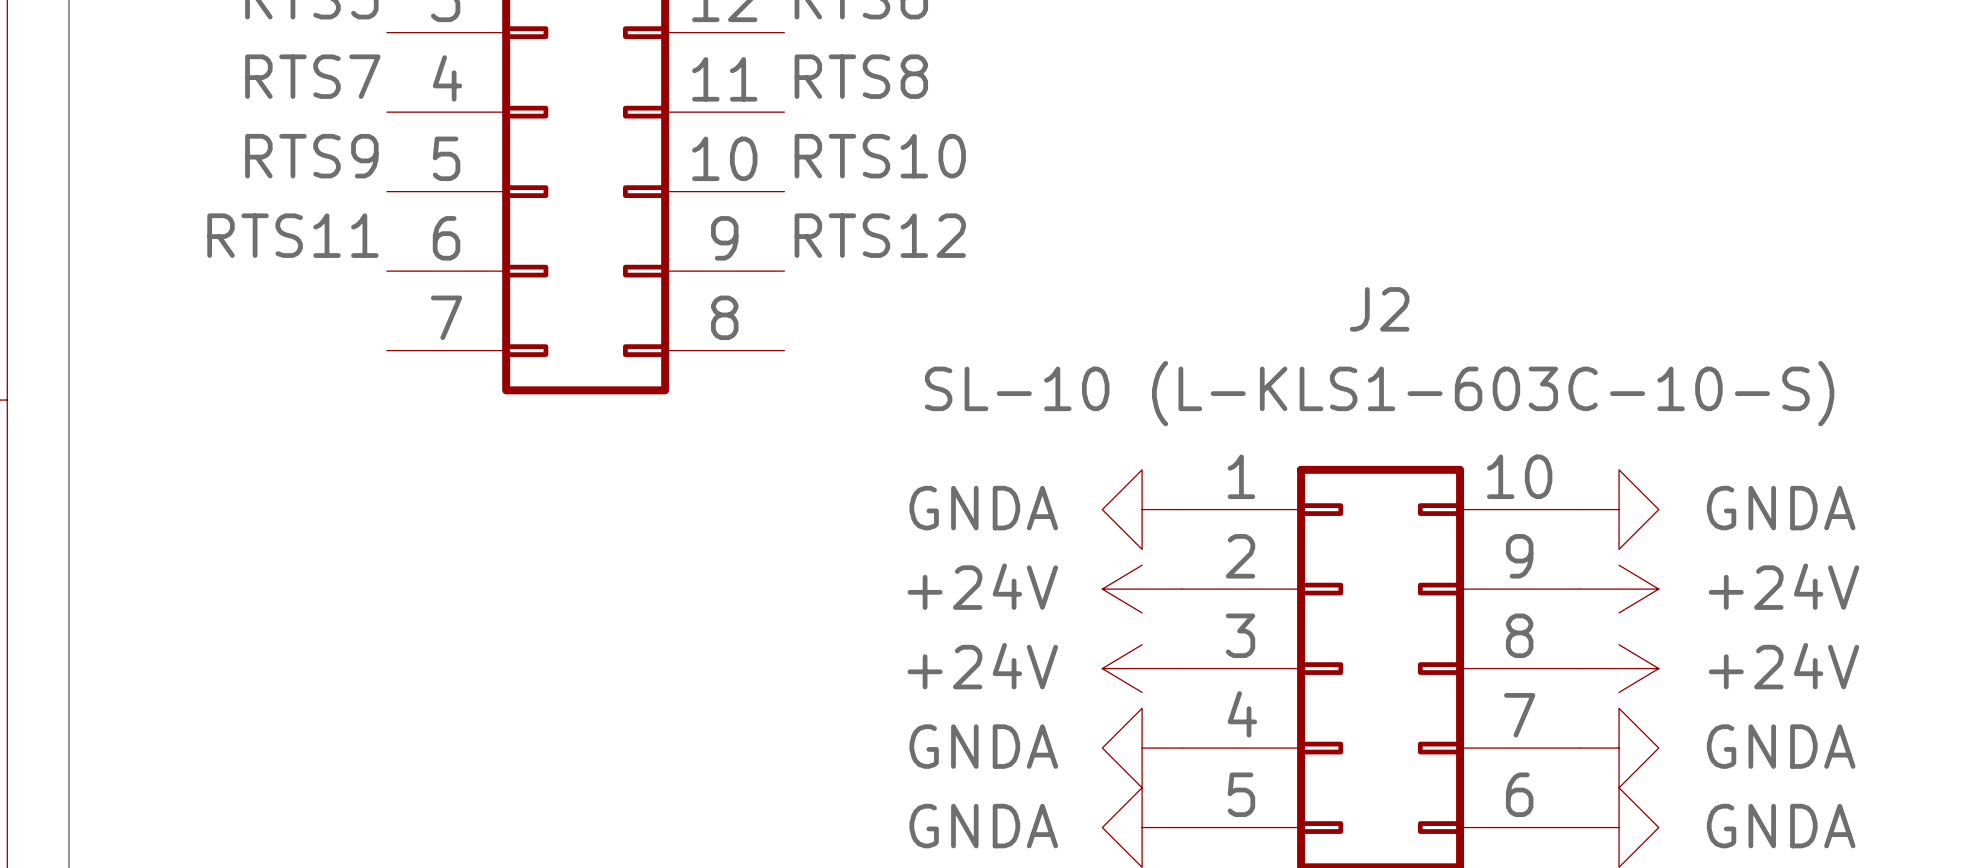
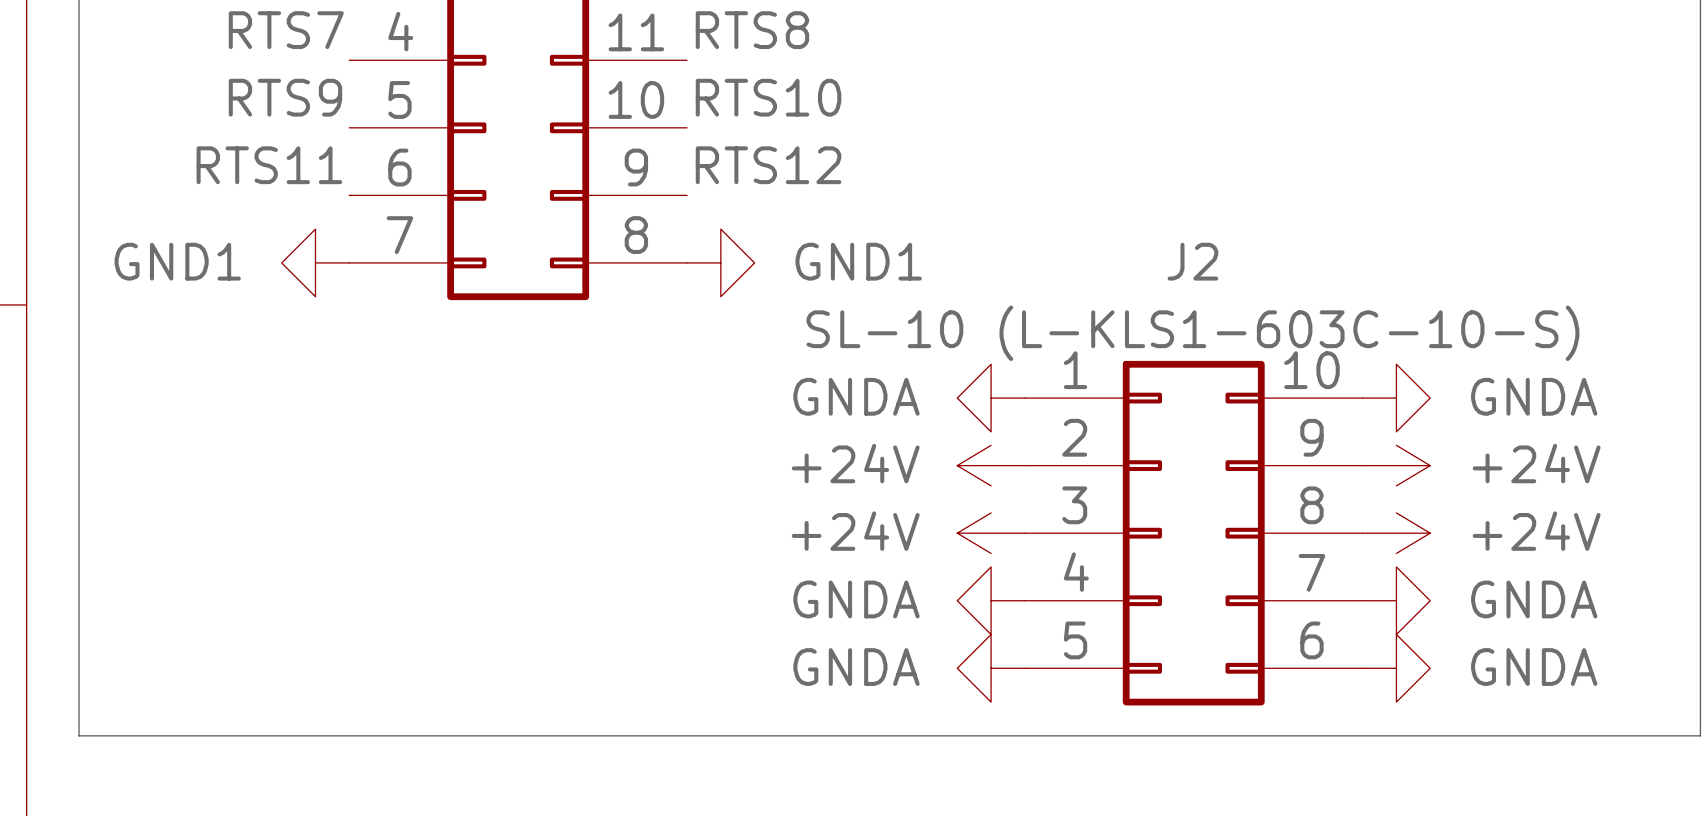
J2 name position: J2 (1379, 309) -> J2 (1192, 261)
power symbol: none -> GND1 (315, 262)
power symbol: none -> GND1 (720, 262)
J2 value position: SL-10 (L-KLS1-603C-10-S) (1379, 393) -> SL-10 (L-KLS1-603C-10-S) (1192, 333)

